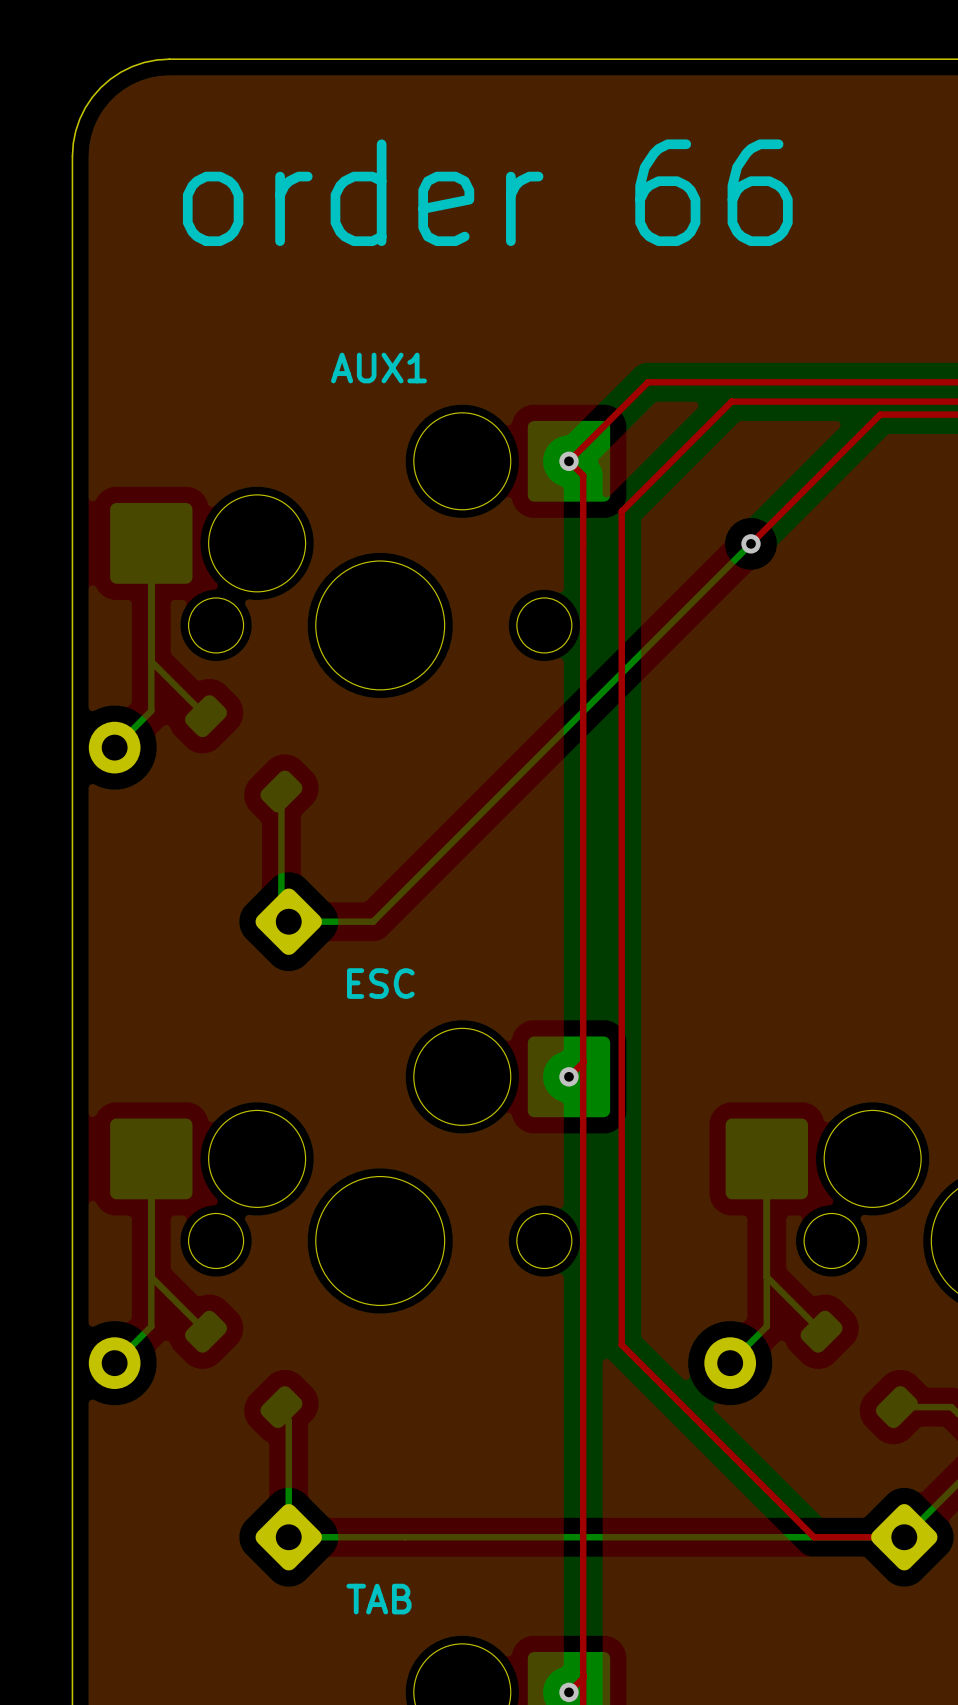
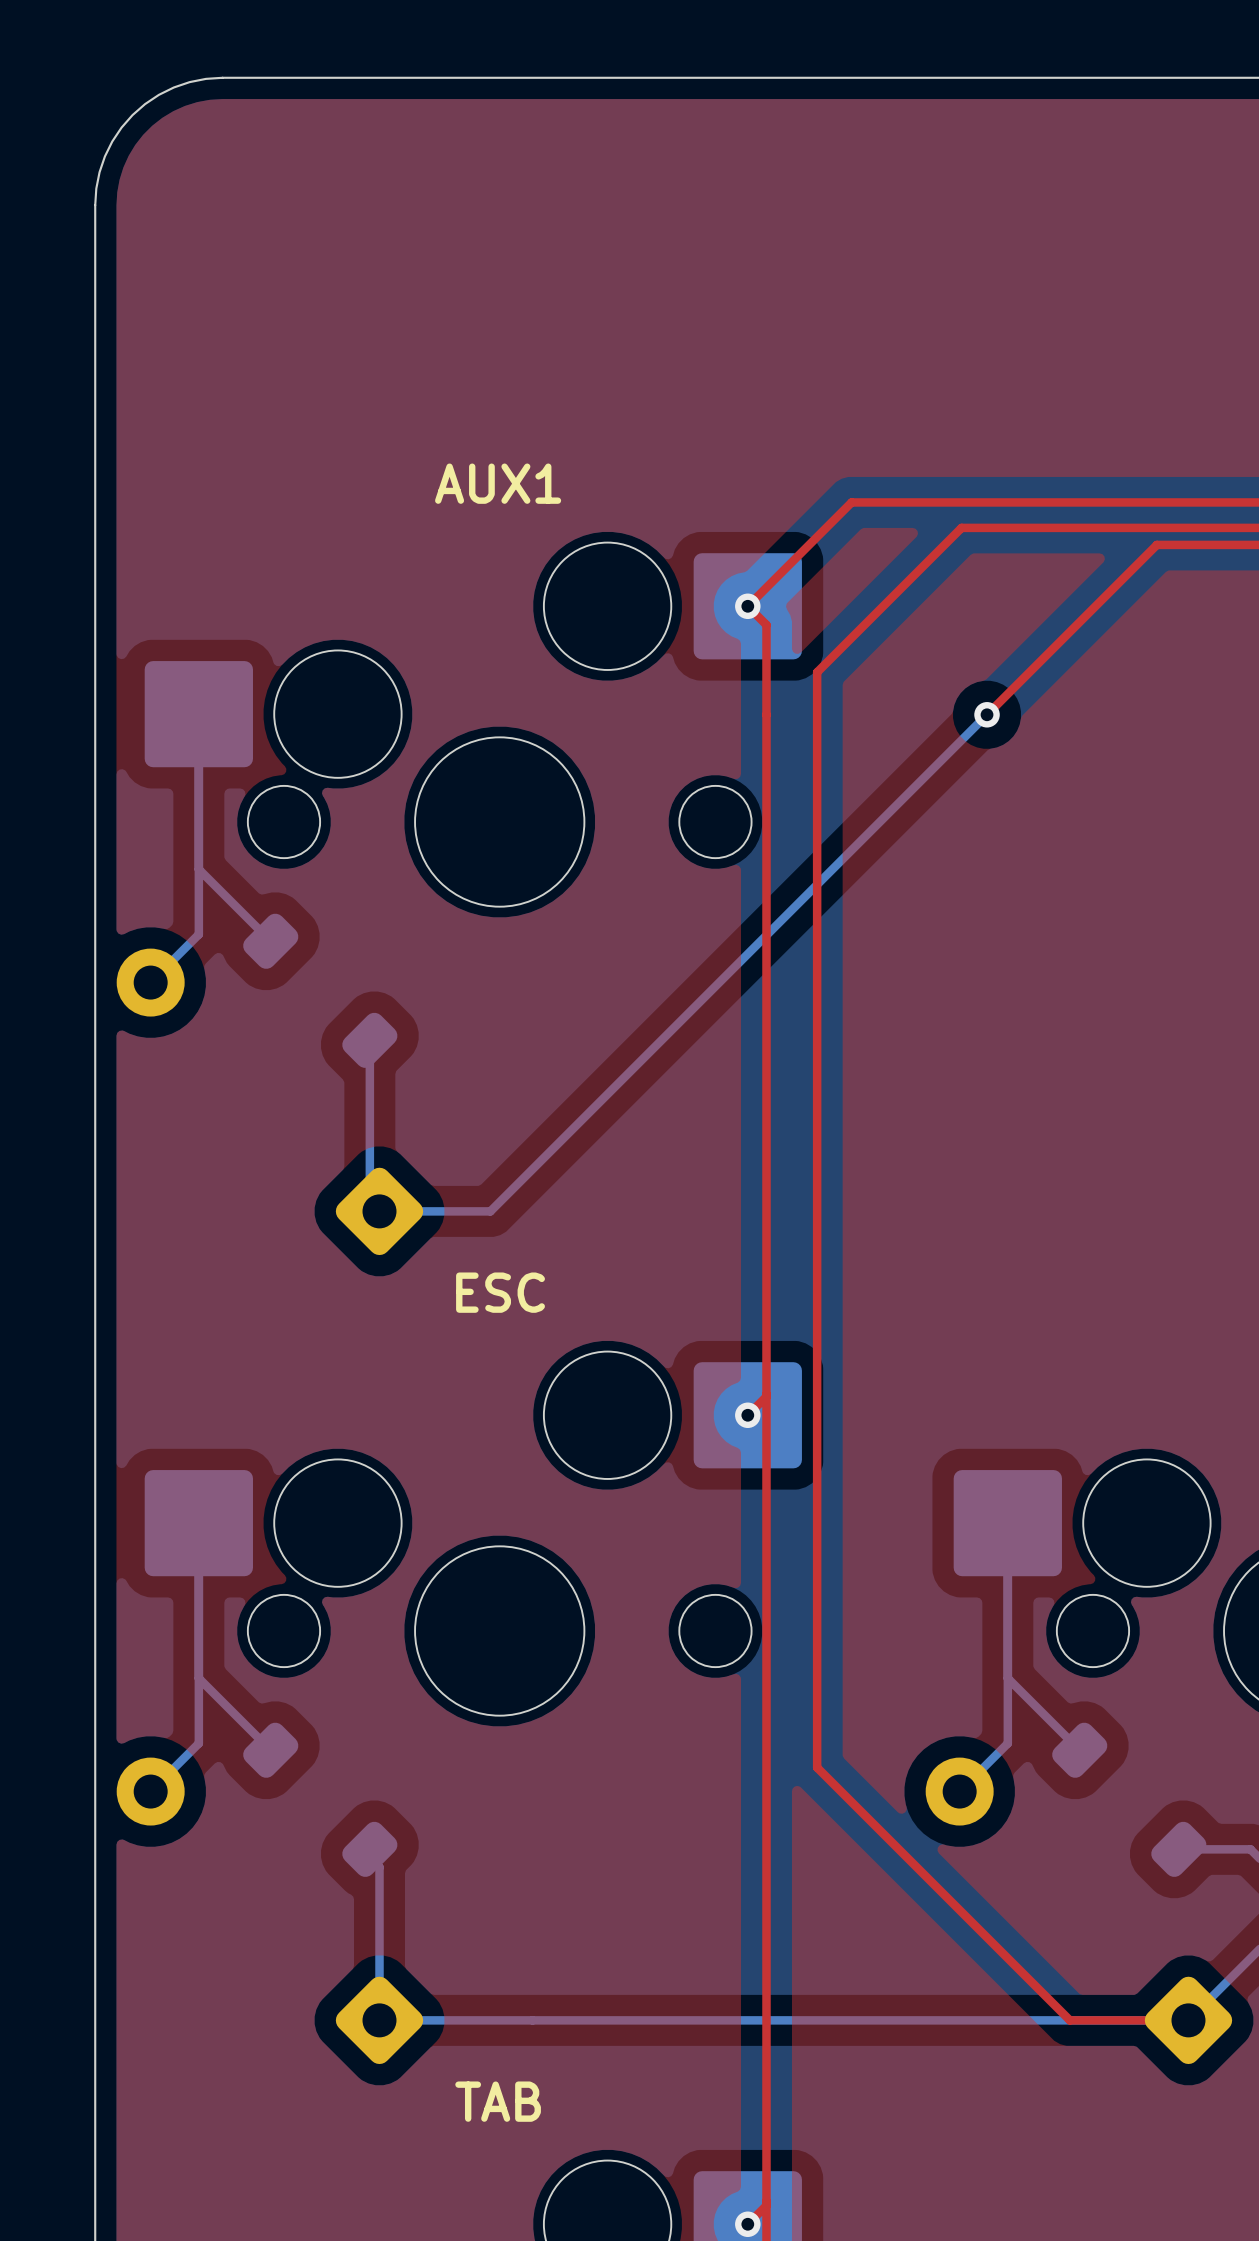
text: order 66 (487, 192) -> none

